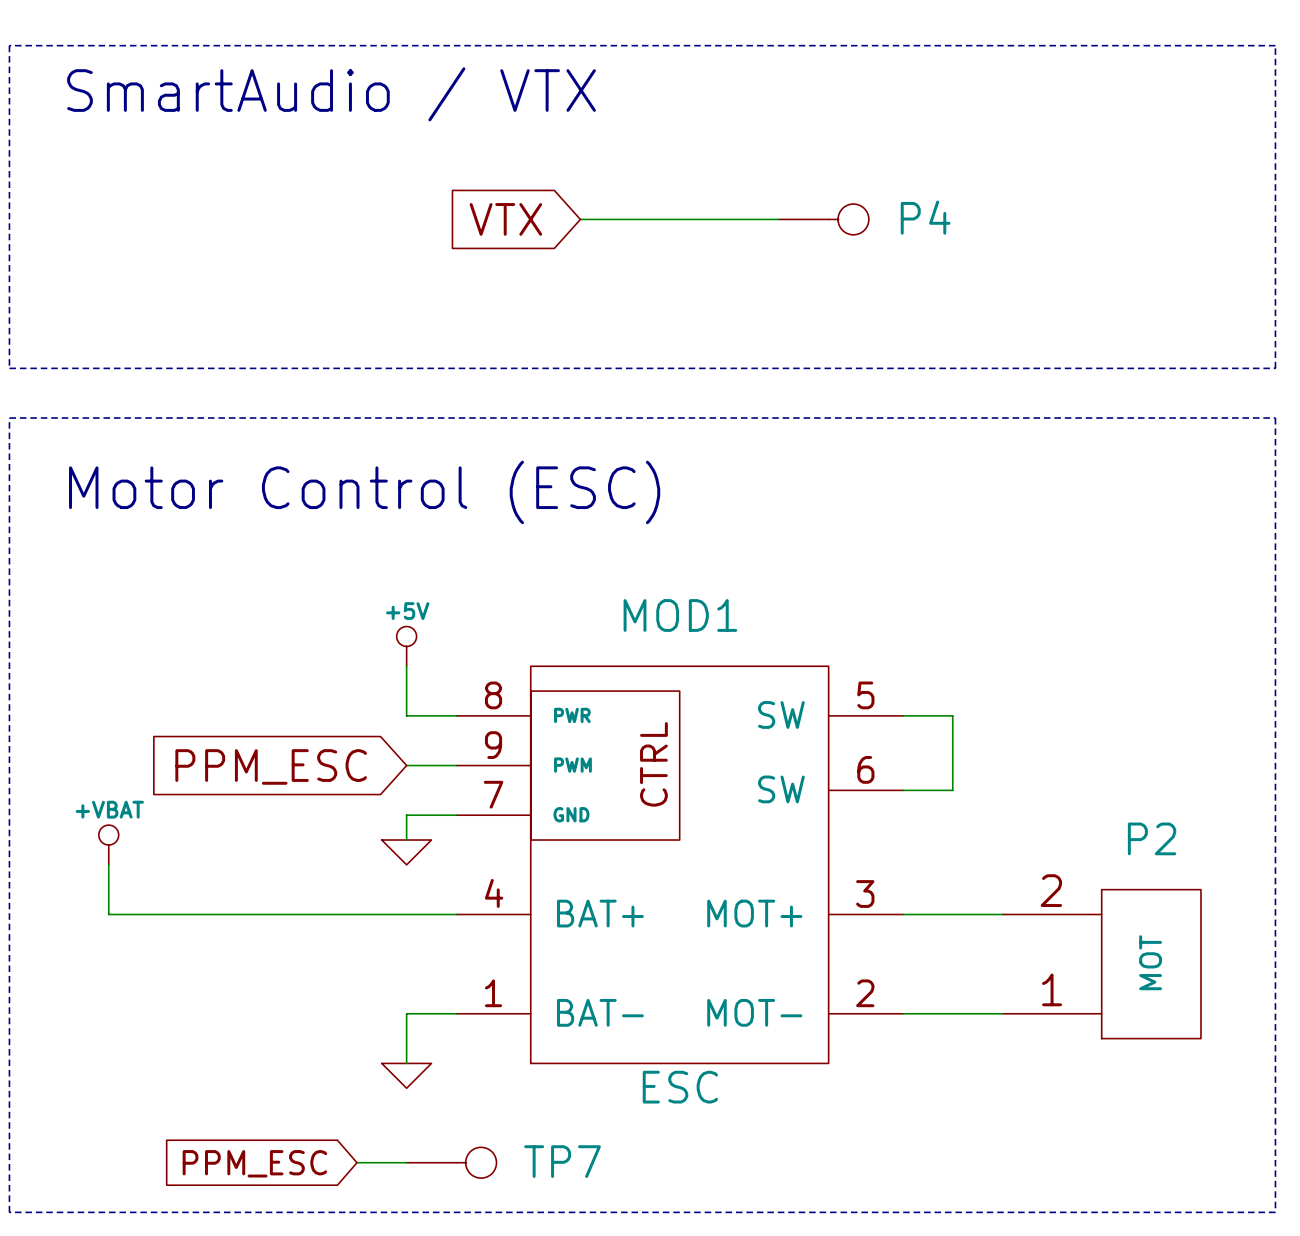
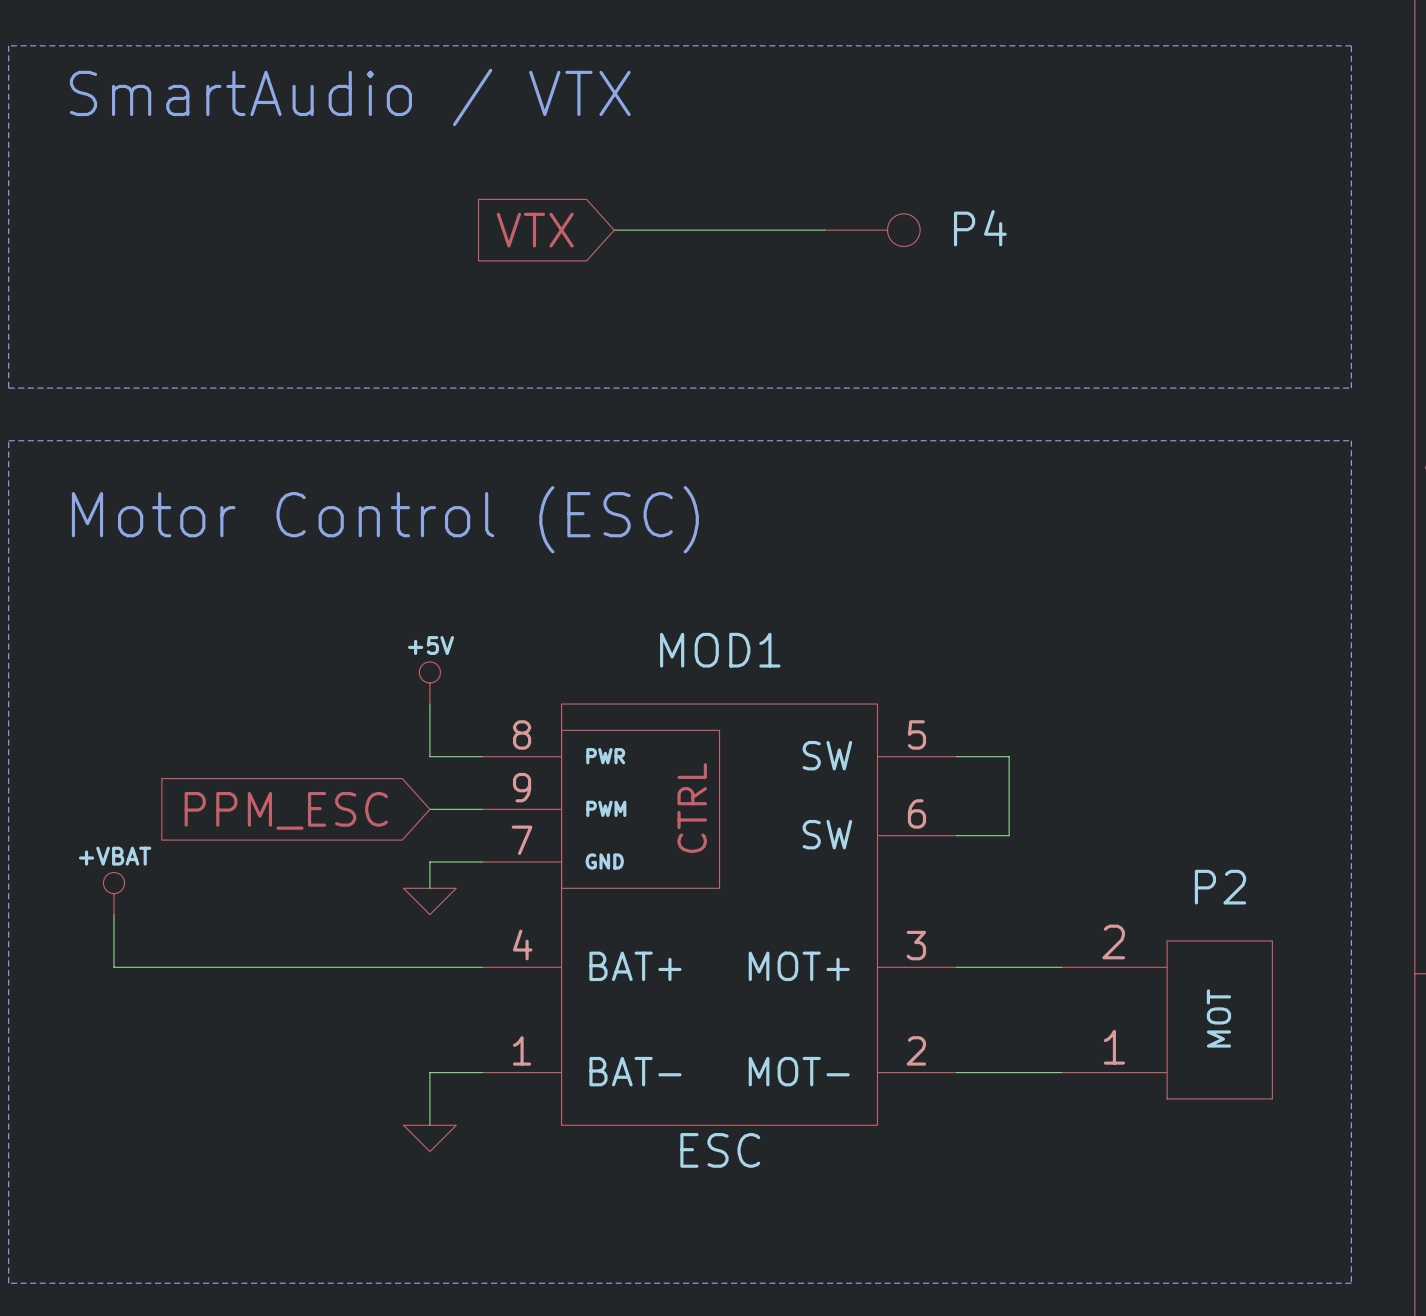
wire: (356, 1162) (406, 1162) -> none
TP7: (451, 1162) -> none
global label: PPM_ESC (254, 1163) -> none

